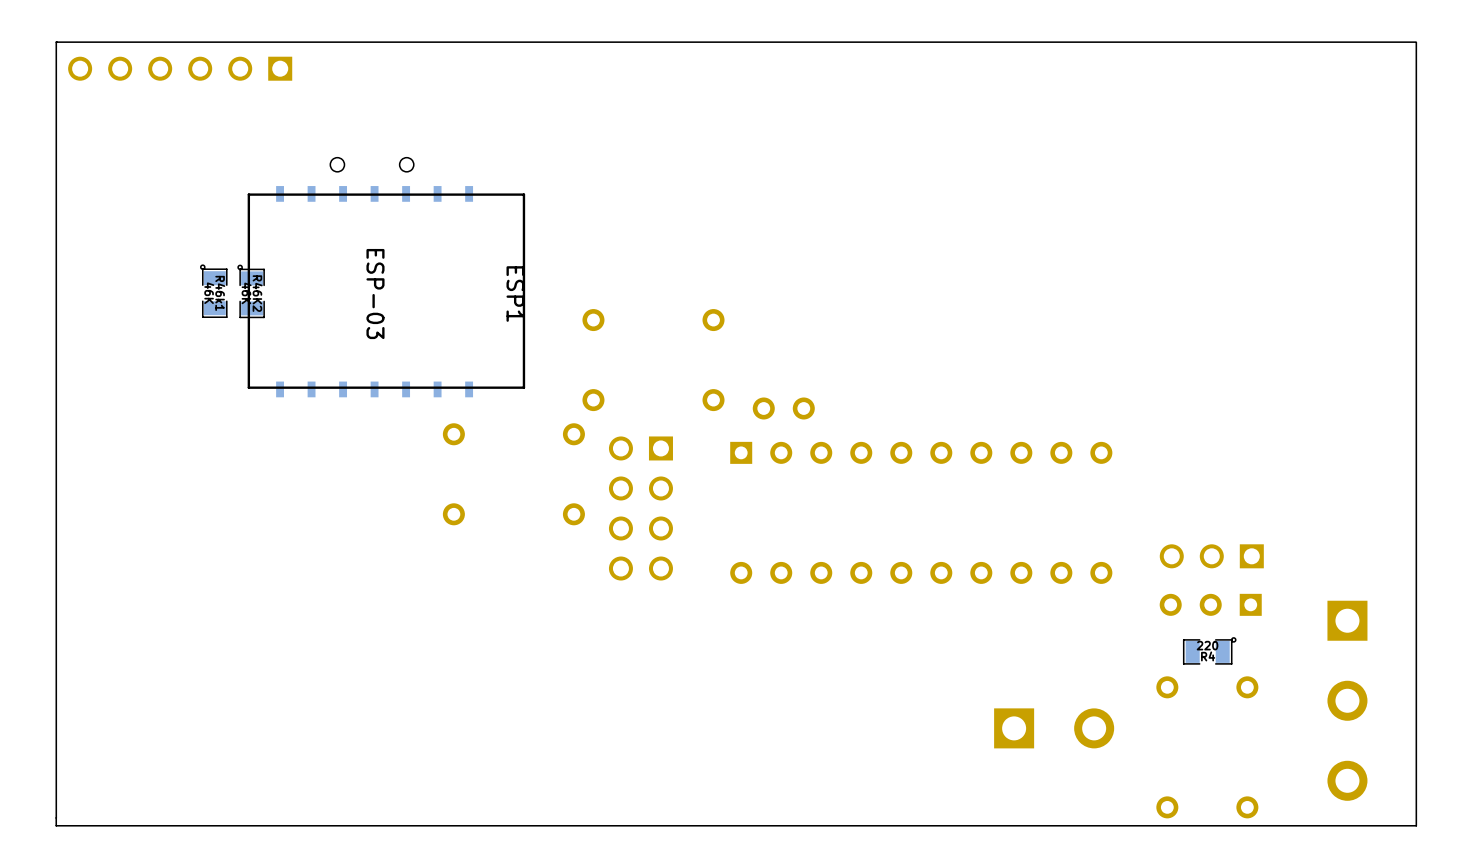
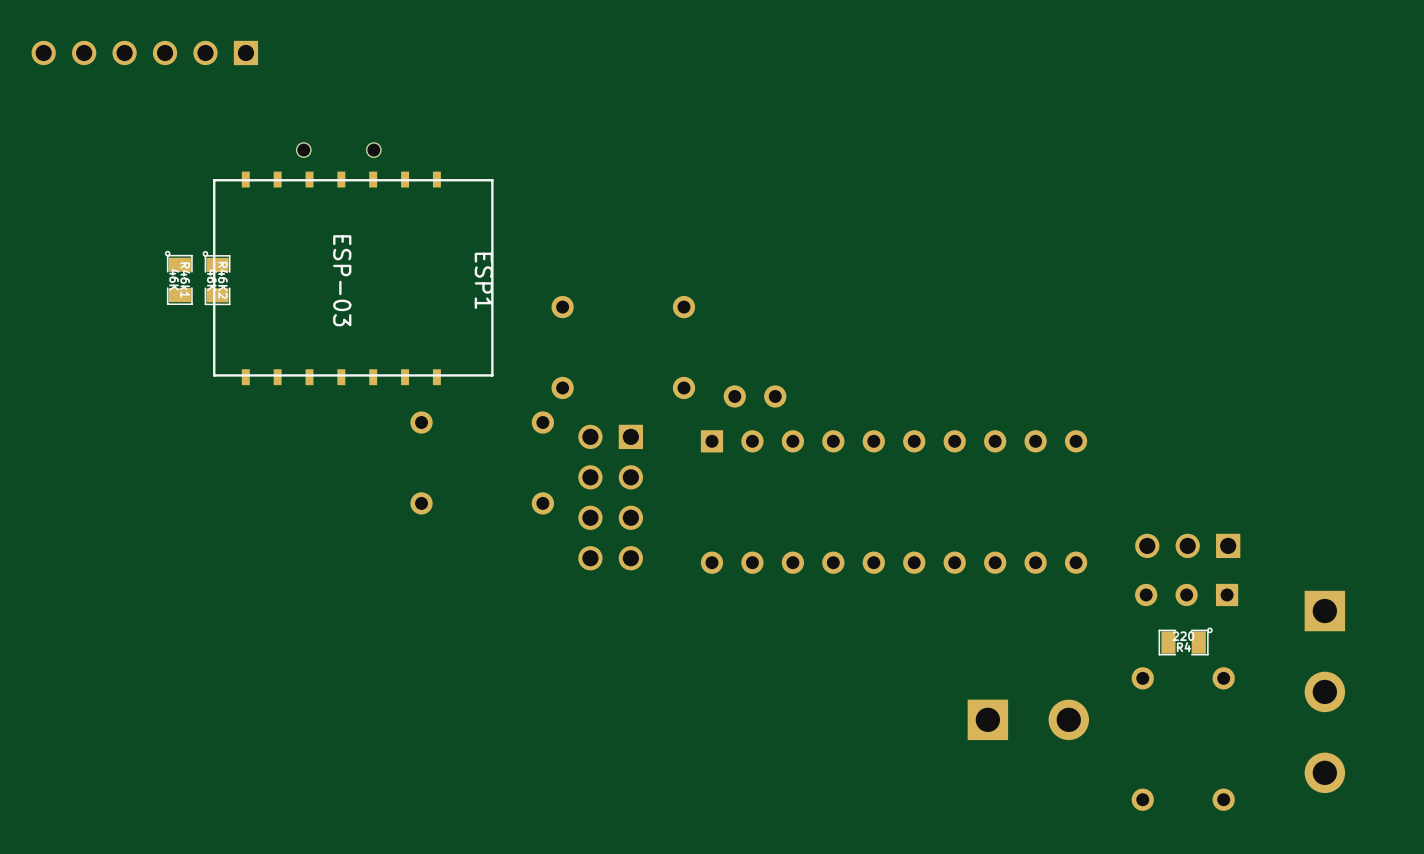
board edge: (1415, 42) (56, 42) (56, 825) (1416, 825) (1416, 42) -> none

